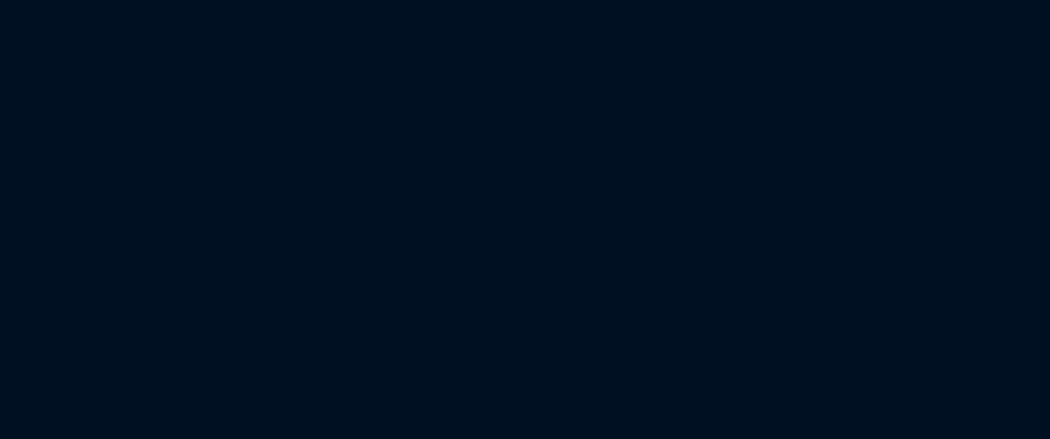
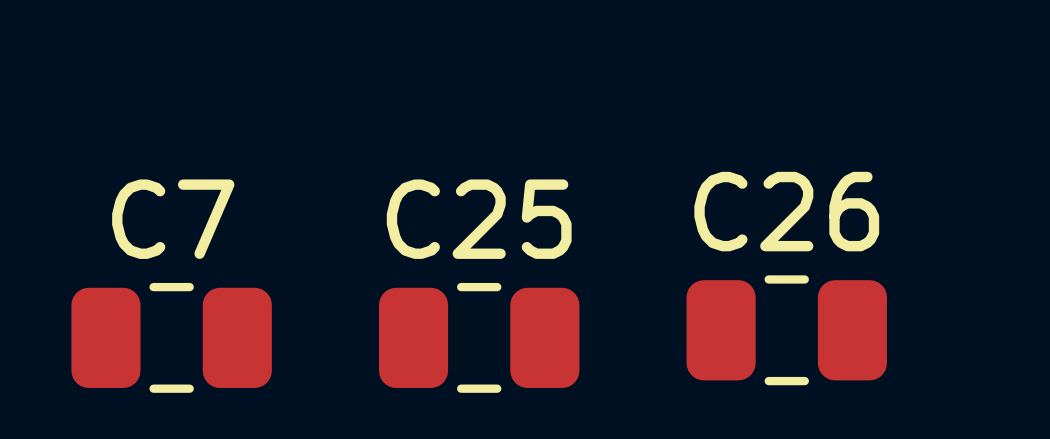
C26: none -> (786, 330)
C7: none -> (171, 337)
C25: none -> (479, 337)

